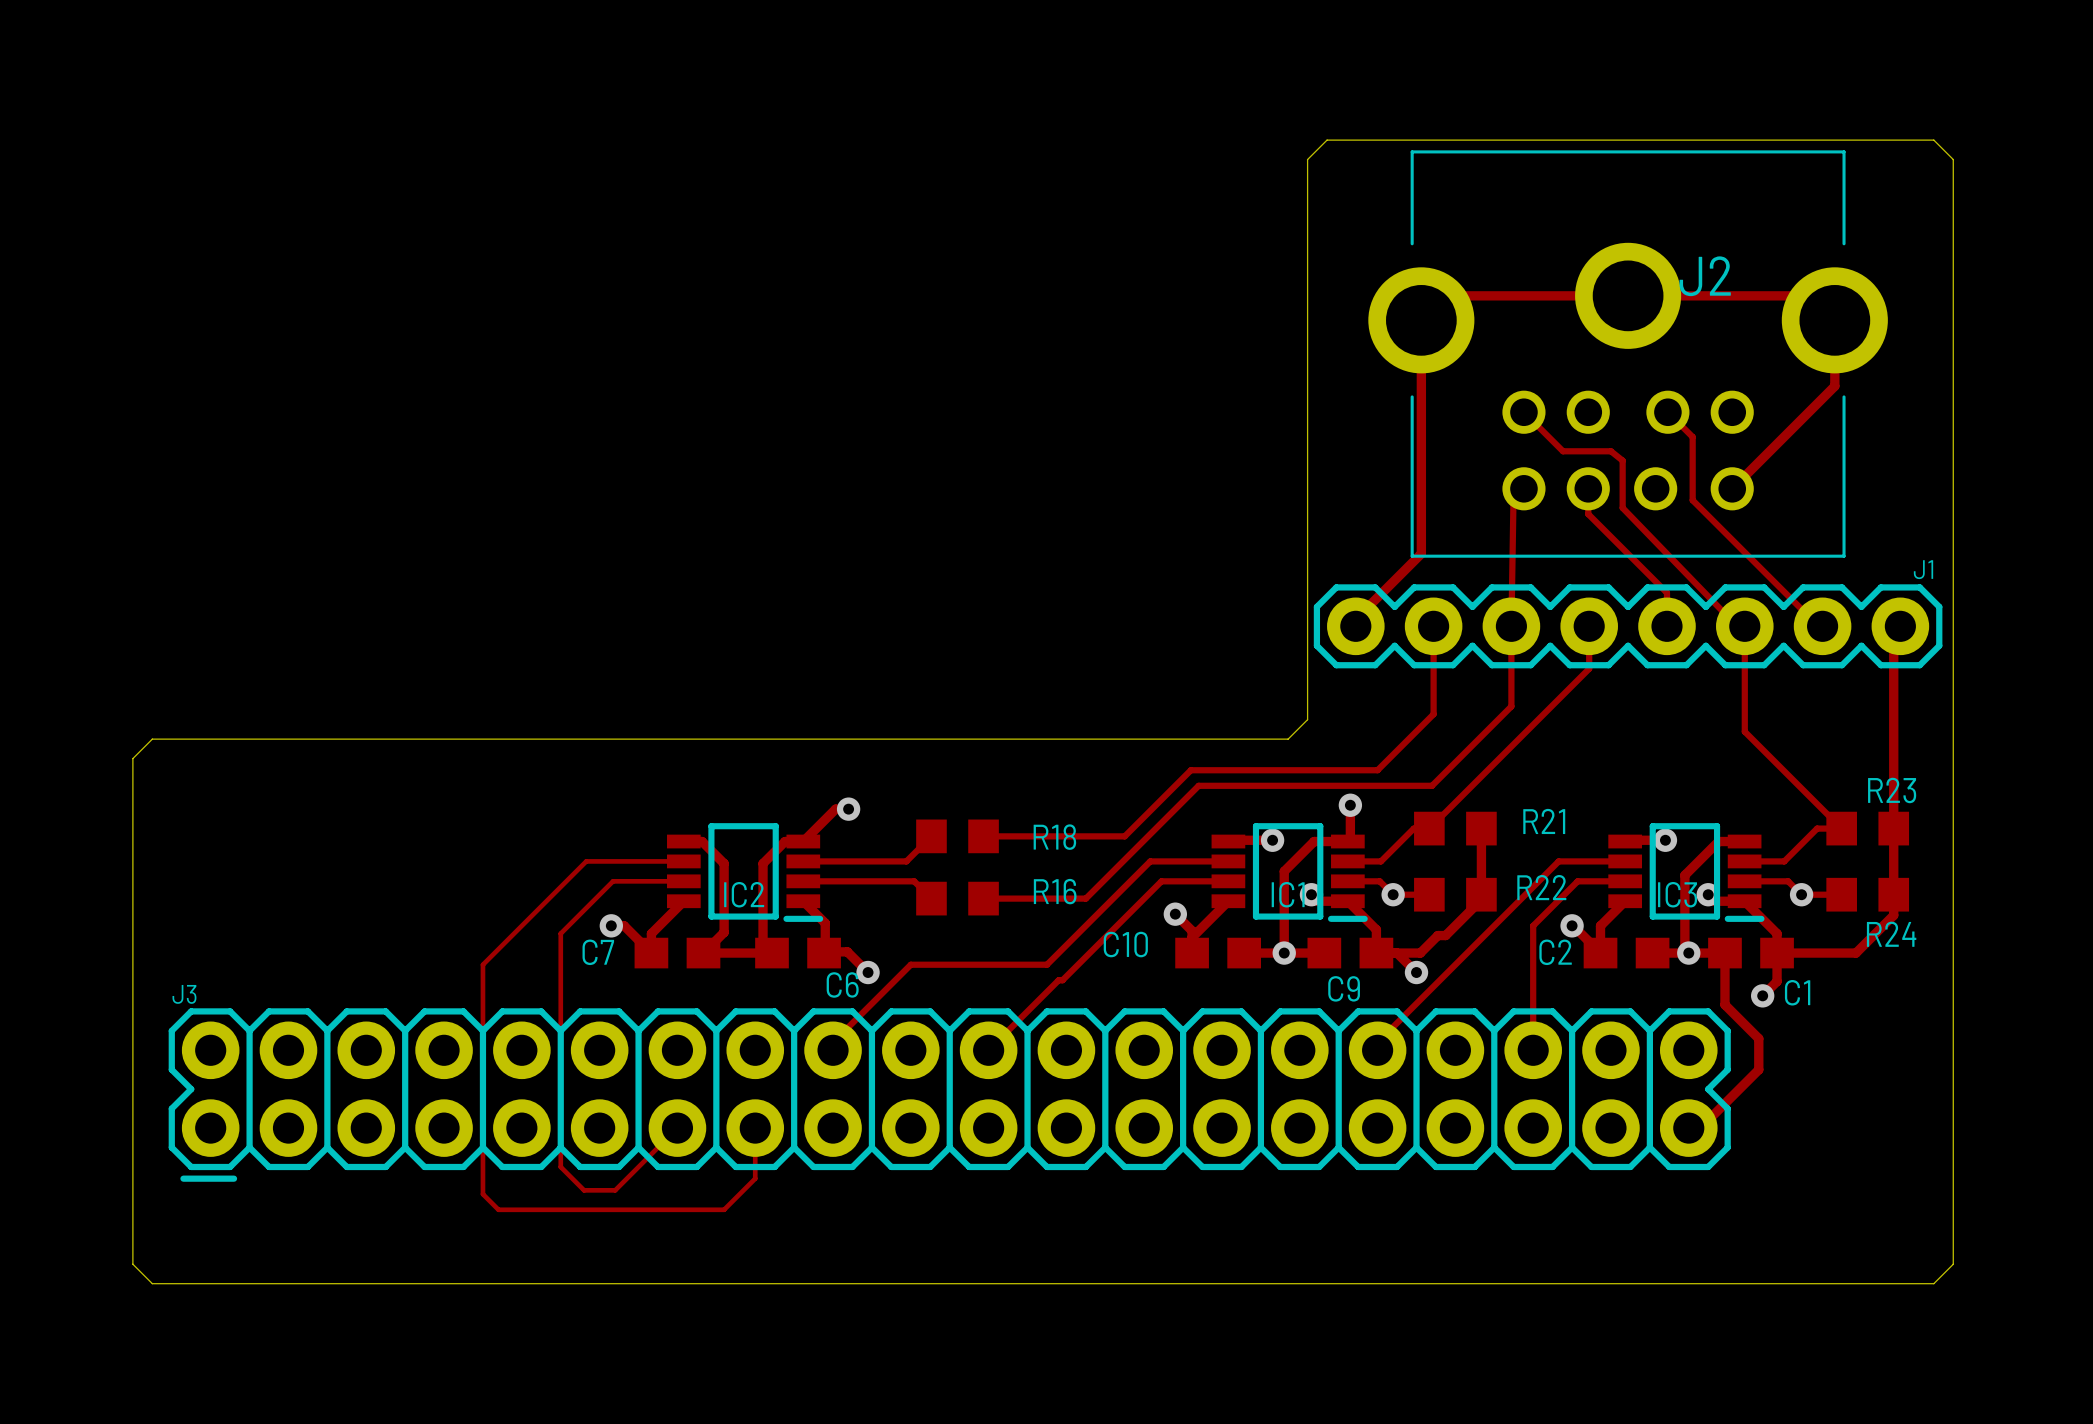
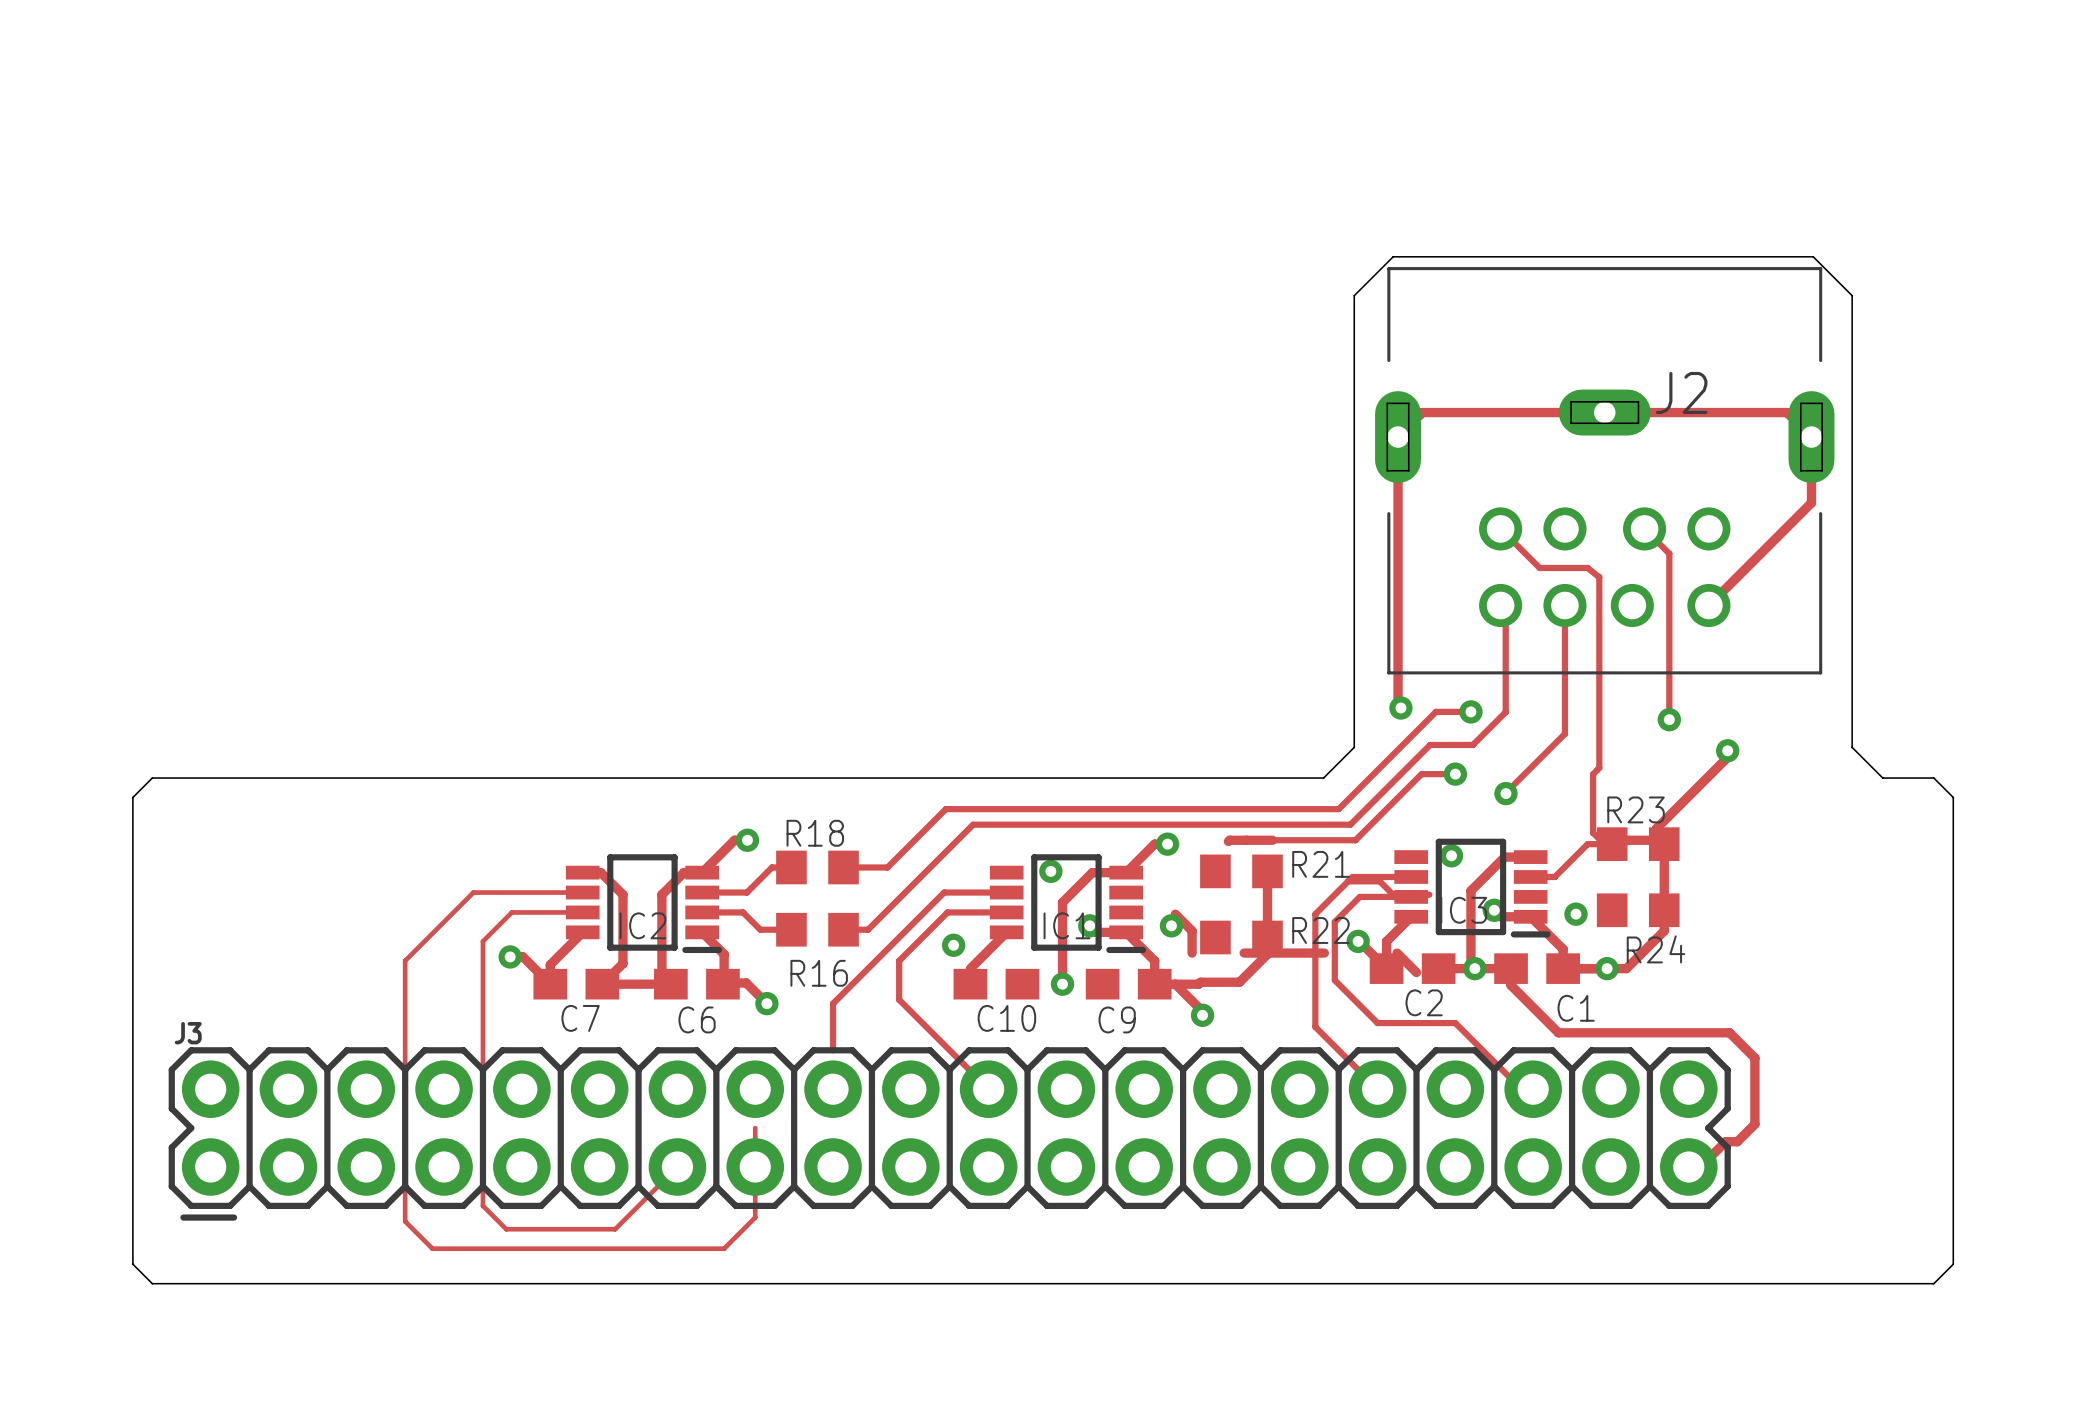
J2 footprint: [1368, 150, 1888, 558] -> [1375, 267, 1835, 675]
track: (1523, 412) (1563, 451) (1610, 451) (1622, 460) (1622, 507) (1737, 626) (1744, 626) (1744, 731) (1841, 828) (1817, 828) (1784, 861) (1744, 861) -> none
track: (1667, 412) (1692, 436) (1692, 500) (1818, 626) (1822, 626) -> none
track: (1523, 488) (1513, 499) (1511, 706) (1505, 712) -> (1500, 605) (1505, 610) (1505, 712)
track: (1588, 488) (1588, 514) (1666, 592) (1666, 626) -> none
track: (1732, 488) (1834, 386) (1834, 320) (1810, 295) (1445, 295) (1421, 320) (1421, 553) (1355, 619) (1355, 626) -> none
track: none -> (1500, 528) (1539, 567) (1587, 567) (1599, 577) (1599, 767) (1593, 774) (1593, 832) (1604, 844)
track: none -> (1644, 528) (1669, 553) (1669, 719)
track: none -> (1564, 605) (1564, 733) (1505, 793)
track: none -> (1708, 605) (1811, 502) (1811, 437) (1786, 412) (1422, 412) (1398, 437) (1398, 705) (1400, 708)
track: (1433, 626) (1433, 714) -> (1470, 711) (1435, 711) (1433, 714)
track: (1589, 626) (1589, 668) (1429, 828) (1413, 828) (1380, 861) (1347, 861) -> none
J1: (1628, 626) -> none
track: (1900, 626) (1893, 632) (1893, 915) (1856, 953) (1777, 953) -> none
via: none -> (1400, 708)
via: none -> (1470, 711)
via: none -> (1669, 719)
track: (1472, 744) (1432, 785) (1198, 785) (1085, 898) (983, 898) -> (1472, 744) (1430, 744) (1350, 824) (973, 824) (868, 929) (843, 929)
track: none -> (1727, 750) (1727, 757) (1656, 828) (1656, 836) (1664, 844) (1664, 930) (1626, 968) (1563, 968) (1563, 949) (1530, 916) (1500, 916) (1494, 910)
via: none -> (1727, 750)
track: (1377, 770) (1190, 770) (1124, 836) (983, 836) -> (1377, 770) (1338, 809) (945, 809) (887, 867) (843, 867)
track: none -> (1455, 774) (1421, 774) (1355, 840) (1272, 840)
via: none -> (1455, 774)
R23 name position: R23 (1892, 790) -> R23 (1636, 809)
via: none -> (1505, 793)
board edge: (132, 797) (132, 758) (152, 739) (1288, 739) (1307, 719) (1307, 159) (1327, 140) (1933, 140) (1953, 159) (1953, 797) -> (132, 797) (152, 778) (1323, 778) (1354, 747) (1354, 295) (1393, 256) (1813, 256) (1852, 295) (1852, 747) (1882, 778) (1933, 778) (1953, 797)
track: (1350, 805) (1350, 839) (1347, 841) (1314, 841) (1284, 871) (1284, 953) -> none
via: (1350, 805) -> none
track: (848, 809) (835, 809) (803, 841) (785, 841) (763, 863) (763, 944) (772, 953) (703, 953) (724, 932) (724, 863) (702, 841) (683, 841) -> (747, 840) (734, 840) (702, 872) (683, 872) (661, 894) (661, 975) (670, 984) (602, 984) (622, 963) (622, 894) (600, 872) (582, 872)
via: (848, 809) -> none
R21 position: (1455, 828) -> (1241, 871)
track: (1481, 828) (1481, 899) (1445, 935) (1437, 935) (1420, 953) (1376, 953) (1376, 929) (1347, 901) (1318, 901) (1311, 894) -> none
R23 position: (1867, 828) -> (1638, 844)
track: (931, 836) (906, 861) (803, 861) -> none
R18 position: (957, 836) -> (817, 867)
R18 name position: R18 (1054, 837) -> R18 (815, 833)
via: none -> (747, 840)
via: (1272, 840) -> none
via: (1665, 840) -> none
track: (1744, 841) (1718, 841) (1684, 875) (1684, 949) (1688, 953) -> (1530, 857) (1504, 857) (1470, 890) (1470, 964) (1474, 968)
track: none -> (1167, 844) (1154, 844) (1126, 872) (1092, 872) (1062, 902) (1062, 984)
via: none -> (1167, 844)
track: none -> (1612, 844) (1587, 844) (1554, 876) (1530, 876)
via: none -> (1451, 855)
track: (683, 861) (586, 861) (482, 964) -> (582, 912) (511, 912) (482, 941) (482, 964)
track: (1228, 861) (1150, 861) (1046, 964) (910, 964) (833, 1042) -> (1006, 892) (944, 892) (833, 1003) (833, 1042)
track: (1625, 861) (1558, 861) (1377, 1042) (1377, 1050) -> none
track: none -> (791, 867) (772, 867) (746, 892) (702, 892)
via: none -> (1050, 871)
track: none -> (1267, 871) (1267, 954) (1239, 982) (1154, 984) (1154, 960) (1126, 932) (1096, 932) (1089, 925)
IC2 position: (745, 872) -> (643, 903)
IC1 position: (1289, 872) -> (1067, 903)
IC3 position: (1686, 872) -> (1472, 888)
track: none -> (1411, 876) (1352, 876) (1315, 914) (1315, 1026) (1377, 1089)
track: (683, 881) (613, 881) (560, 933) (560, 1167) (584, 1190) (615, 1190) (677, 1128) -> none
track: (803, 881) (914, 881) (931, 898) -> none
track: (1228, 881) (1161, 881) (1062, 980) (1058, 980) (988, 1050) -> none
track: (1625, 881) (1577, 881) (1533, 925) (1533, 1050) -> none
track: (1744, 881) (1788, 881) (1801, 894) (1841, 894) -> none
R16 name position: R16 (1055, 891) -> R16 (819, 973)
track: none -> (582, 892) (473, 892) (405, 960) (405, 1221) (432, 1248) (724, 1248) (755, 1217) (755, 1178)
via: (1311, 894) -> none
via: (1393, 894) -> none
R22 position: (1455, 894) -> (1241, 937)
track: (1708, 894) (1714, 901) (1744, 901) (1777, 933) (1777, 981) (1762, 995) -> none
via: (1708, 894) -> none
via: (1801, 894) -> none
R24 position: (1867, 894) -> (1638, 910)
track: none -> (1411, 896) (1359, 896) (1334, 921) (1334, 980) (1377, 1023) (1455, 1023) (1521, 1089) (1533, 1089)
R16 position: (957, 898) -> (817, 929)
track: (683, 901) (651, 933) (651, 953) (624, 925) (611, 925) -> (582, 932) (550, 964) (550, 984) (523, 956) (510, 956)
track: (803, 901) (825, 923) (825, 951) -> (702, 932) (724, 954) (724, 982)
track: (1228, 901) (1192, 937) -> (1006, 932) (970, 968)
track: (1625, 901) (1600, 925) (1600, 953) (1572, 925) -> (1411, 916) (1386, 941) (1386, 968) (1358, 941)
via: none -> (1494, 910)
track: none -> (702, 912) (743, 912) (760, 929) (791, 929)
track: none -> (1006, 912) (947, 912) (899, 960) (899, 999) (988, 1089)
via position: (1175, 914) -> (1171, 925)
via: (611, 925) -> none
via: none -> (1089, 925)
via position: (1572, 925) -> (1575, 914)
via: none -> (1358, 941)
C10 name position: C10 (1125, 944) -> C10 (1006, 1018)
via: none -> (953, 945)
track: (825, 951) (847, 951) (868, 972) -> (724, 982) (746, 982) (766, 1003)
C7 name position: C7 (598, 952) -> C7 (580, 1018)
C2 name position: C2 (1555, 952) -> C2 (1424, 1002)
C7 position: (677, 953) -> (576, 984)
C6 position: (798, 953) -> (696, 984)
C10 position: (1218, 953) -> (996, 984)
via: (1284, 953) -> none
C9 position: (1350, 953) -> (1128, 984)
C2 position: (1626, 953) -> (1412, 968)
track: (1652, 953) (1724, 953) (1724, 1004) (1758, 1038) (1758, 1069) (1700, 1128) (1688, 1128) -> none
via: (1688, 953) -> none
C1 position: (1751, 953) -> (1537, 968)
via: none -> (510, 956)
track: none -> (1438, 968) (1511, 968) (1511, 985) (1558, 1032) (1729, 1032) (1754, 1058) (1754, 1124) (1737, 1141) (1725, 1141) (1700, 1167) (1688, 1167)
via: none -> (1474, 968)
via: none -> (1607, 968)
via: (868, 972) -> none
via: (1416, 972) -> none
C6 name position: C6 (842, 984) -> C6 (697, 1019)
via: none -> (1062, 984)
track: none -> (1175, 984) (1202, 1011) (1202, 1015)
via: (1762, 995) -> none
via: none -> (766, 1003)
via: none -> (1202, 1015)
J3 position: (949, 1095) -> (949, 1133)
track: (755, 1178) (724, 1209) (498, 1209) (482, 1194) -> (677, 1167) (615, 1229) (506, 1229) (482, 1205) (482, 1194)

